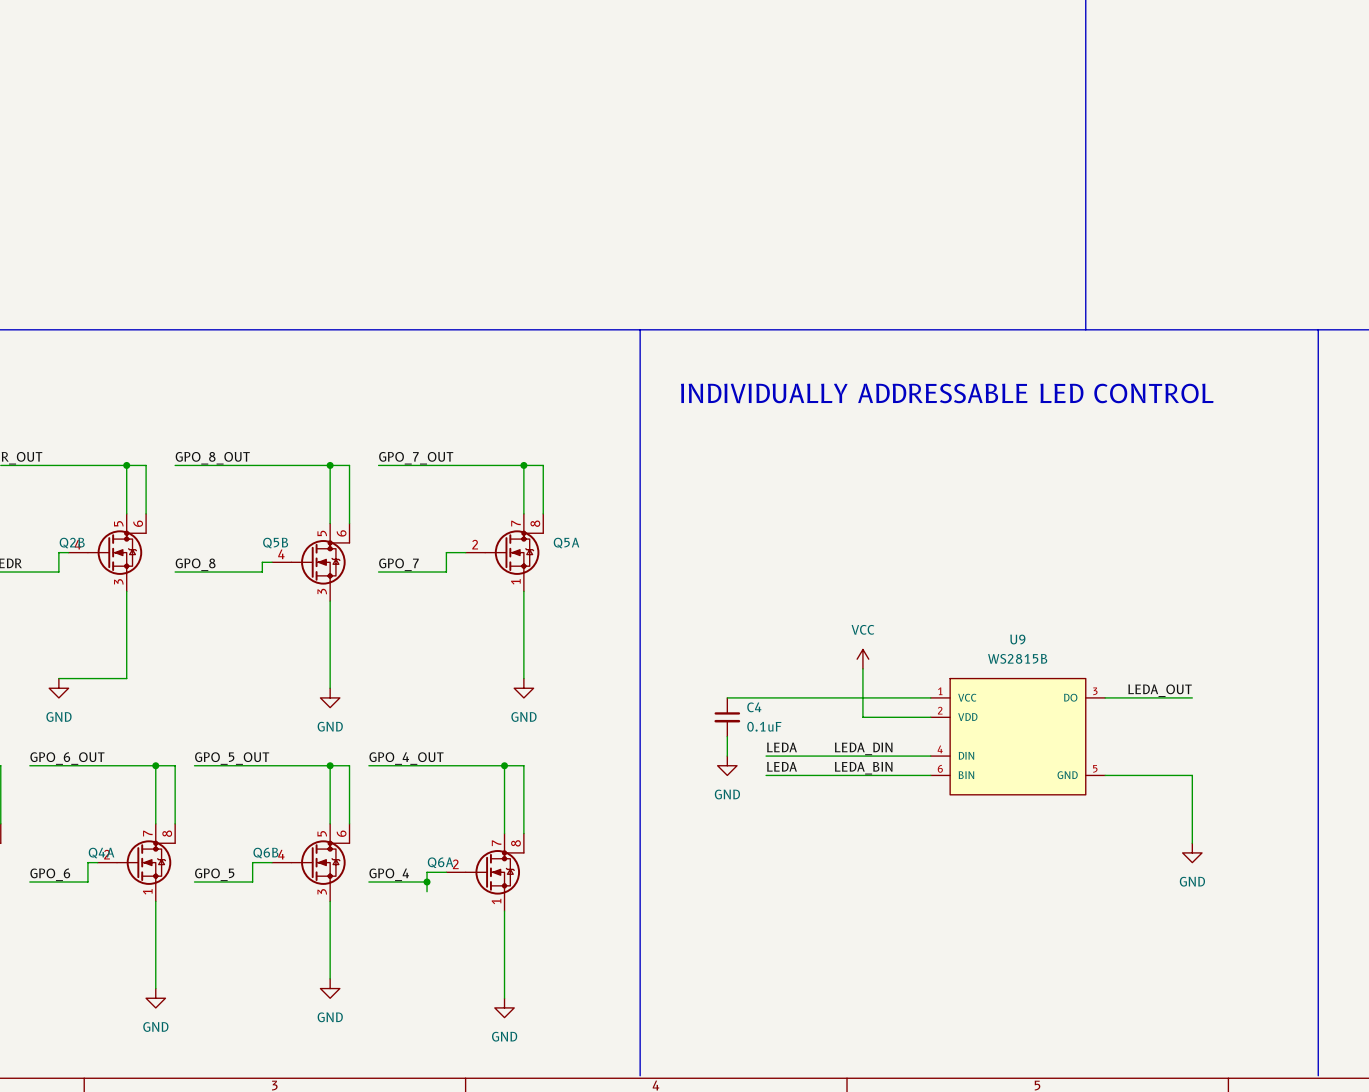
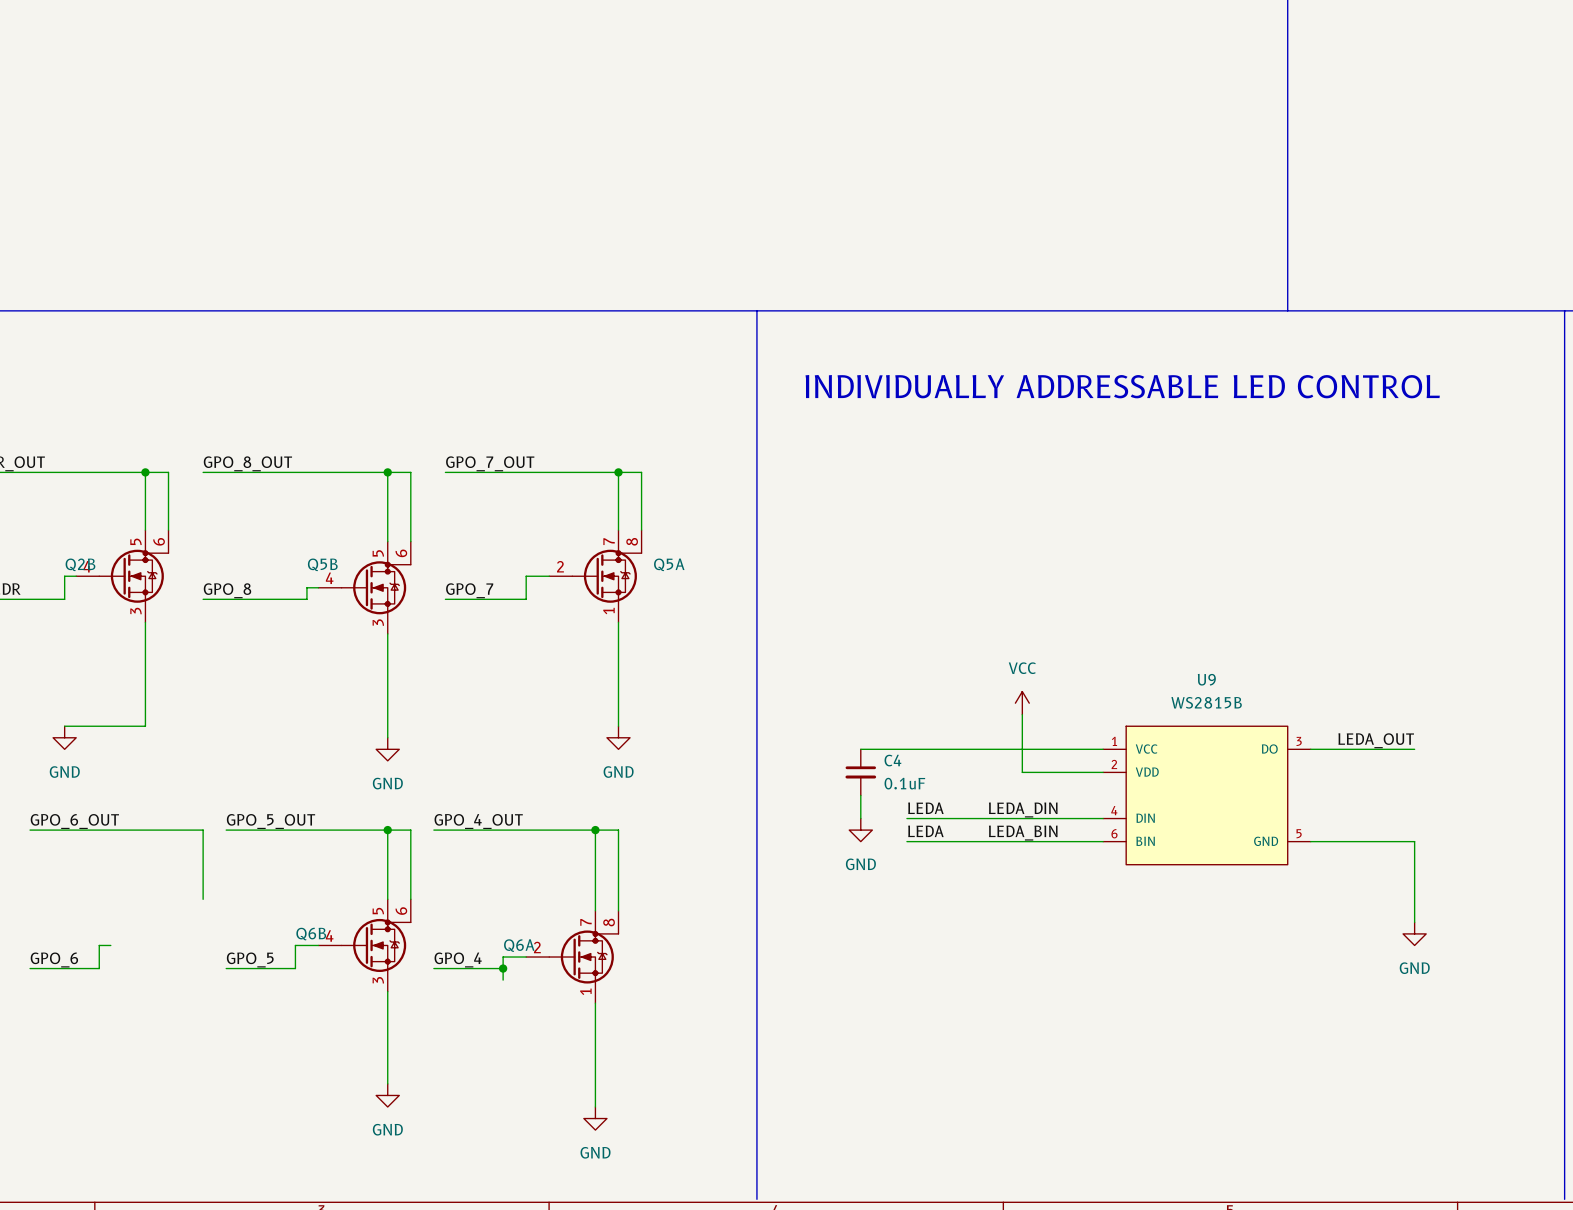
wire: (155, 765) (155, 823) -> none
junction: (155, 765) -> none
Q4A: (136, 862) -> none
wire: (155, 901) (155, 988) -> none
power symbol: GND (155, 998) -> none

